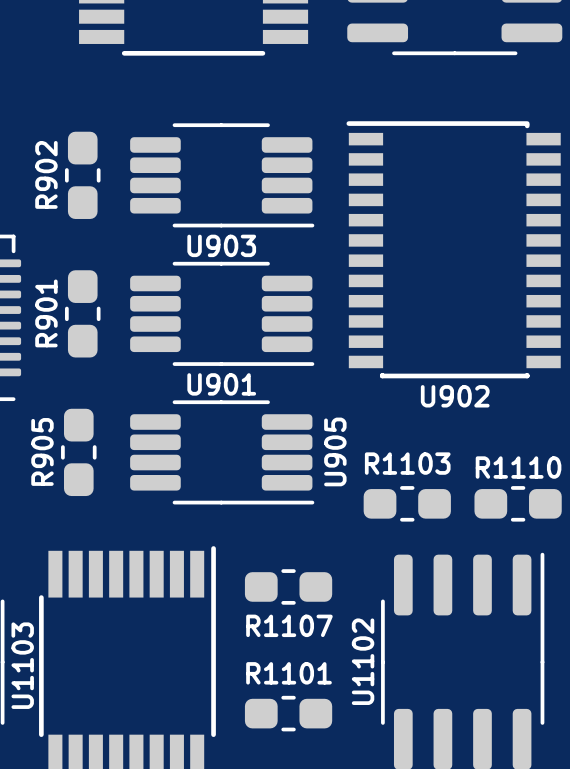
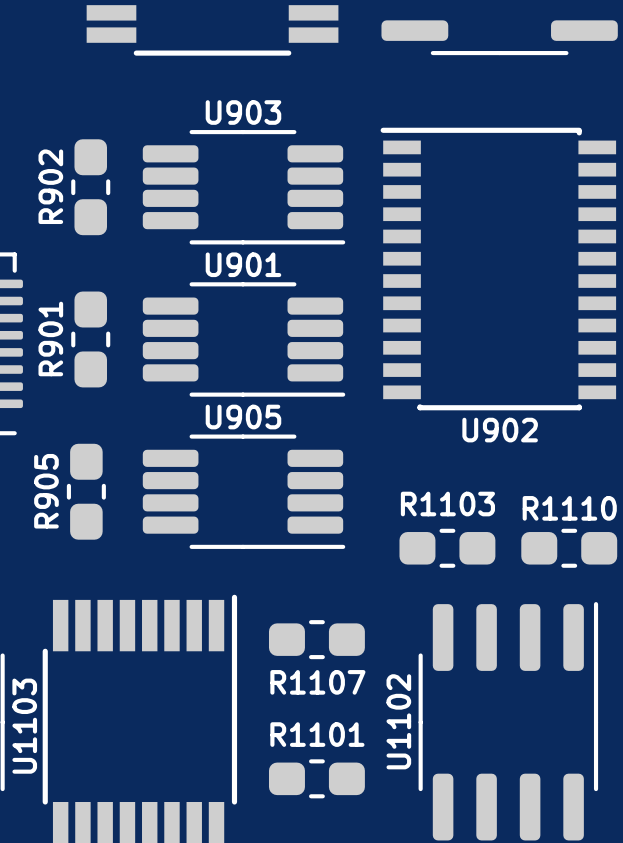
U903 name position: U903 (221, 245) -> U903 (243, 112)
U901 name position: U901 (221, 384) -> U901 (243, 264)
U905 name rotation: 0° (335, 451) -> 90° clockwise (243, 417)
U905 name position: U905 (335, 451) -> U905 (243, 417)

